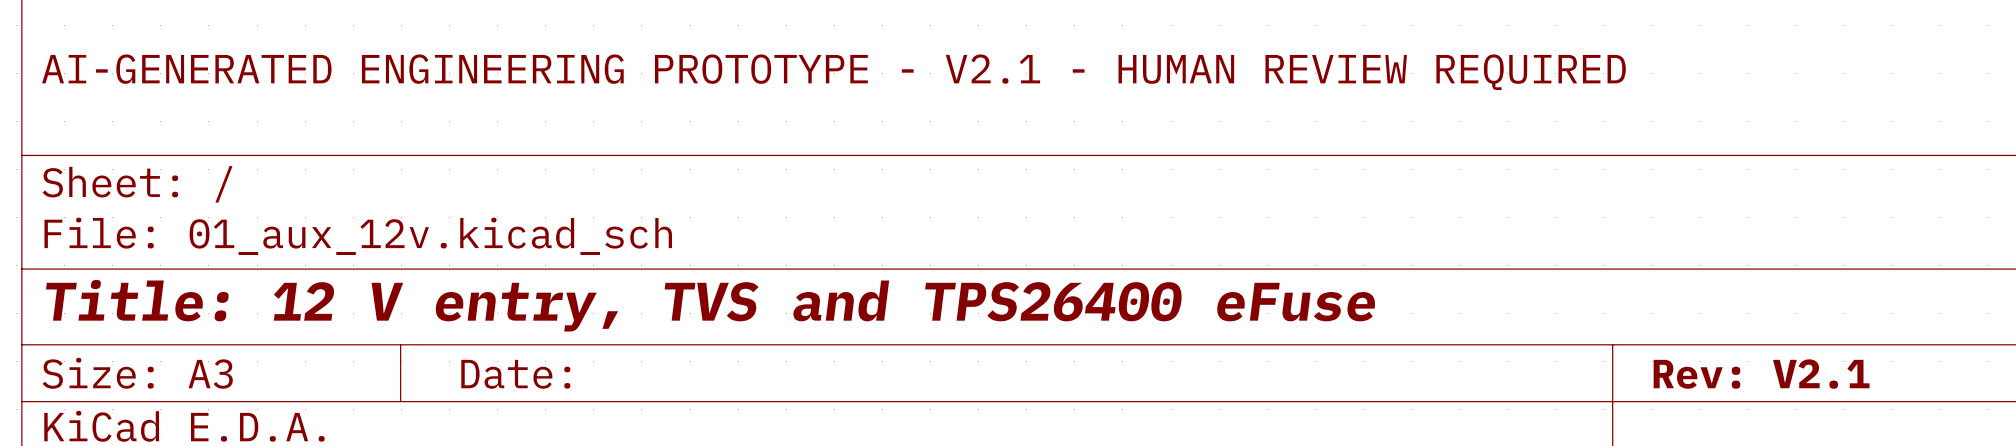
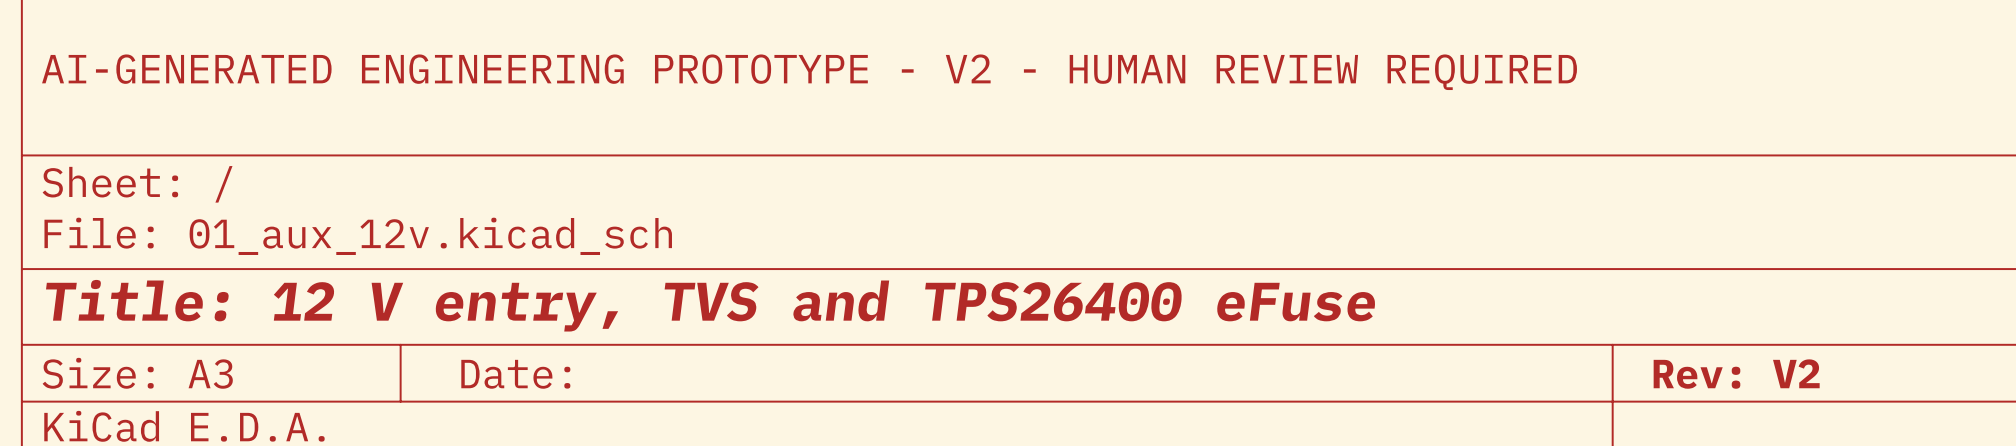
title block: AI-GENERATED ENGINEERING PROTOTYPE - V2.1 - HUMAN REVIEW REQUIRED (833, 72) -> AI-GENERATED ENGINEERING PROTOTYPE - V2 - HUMAN REVIEW REQUIRED (809, 72)
title block: Rev: V2.1 (1761, 374) -> Rev: V2 (1736, 374)

